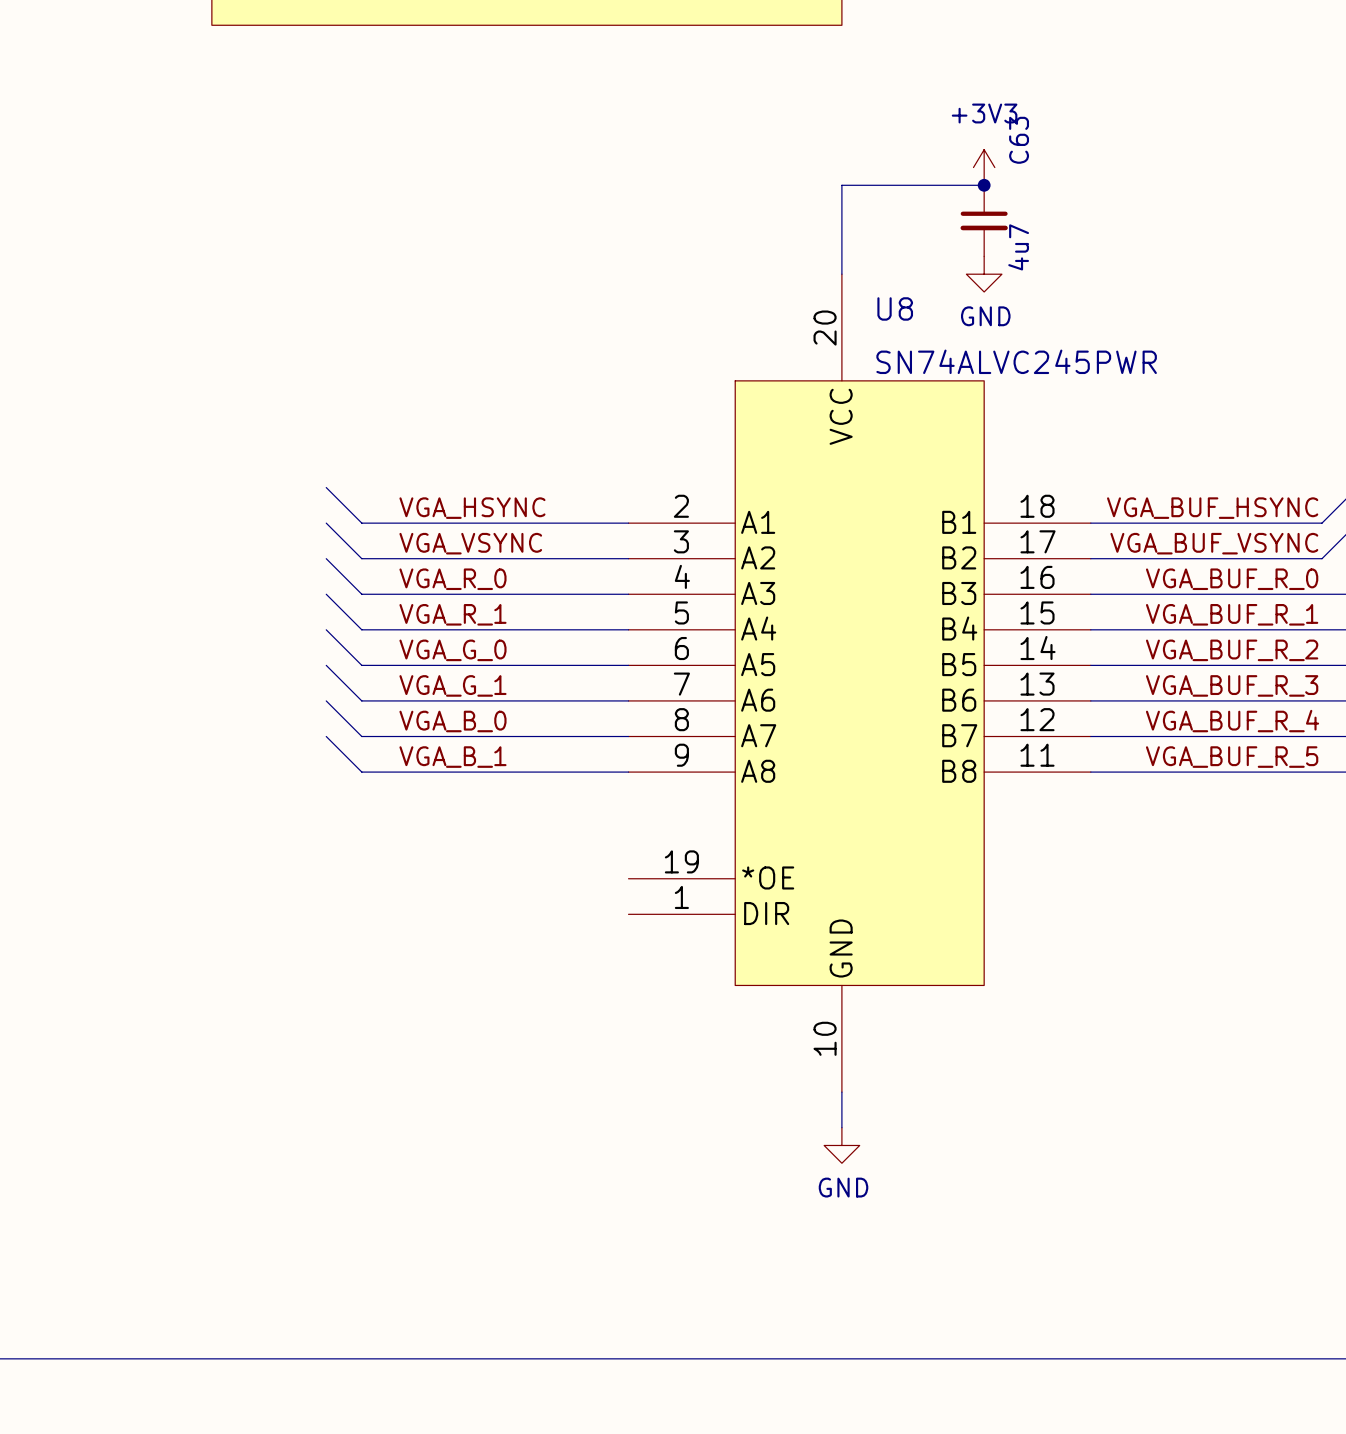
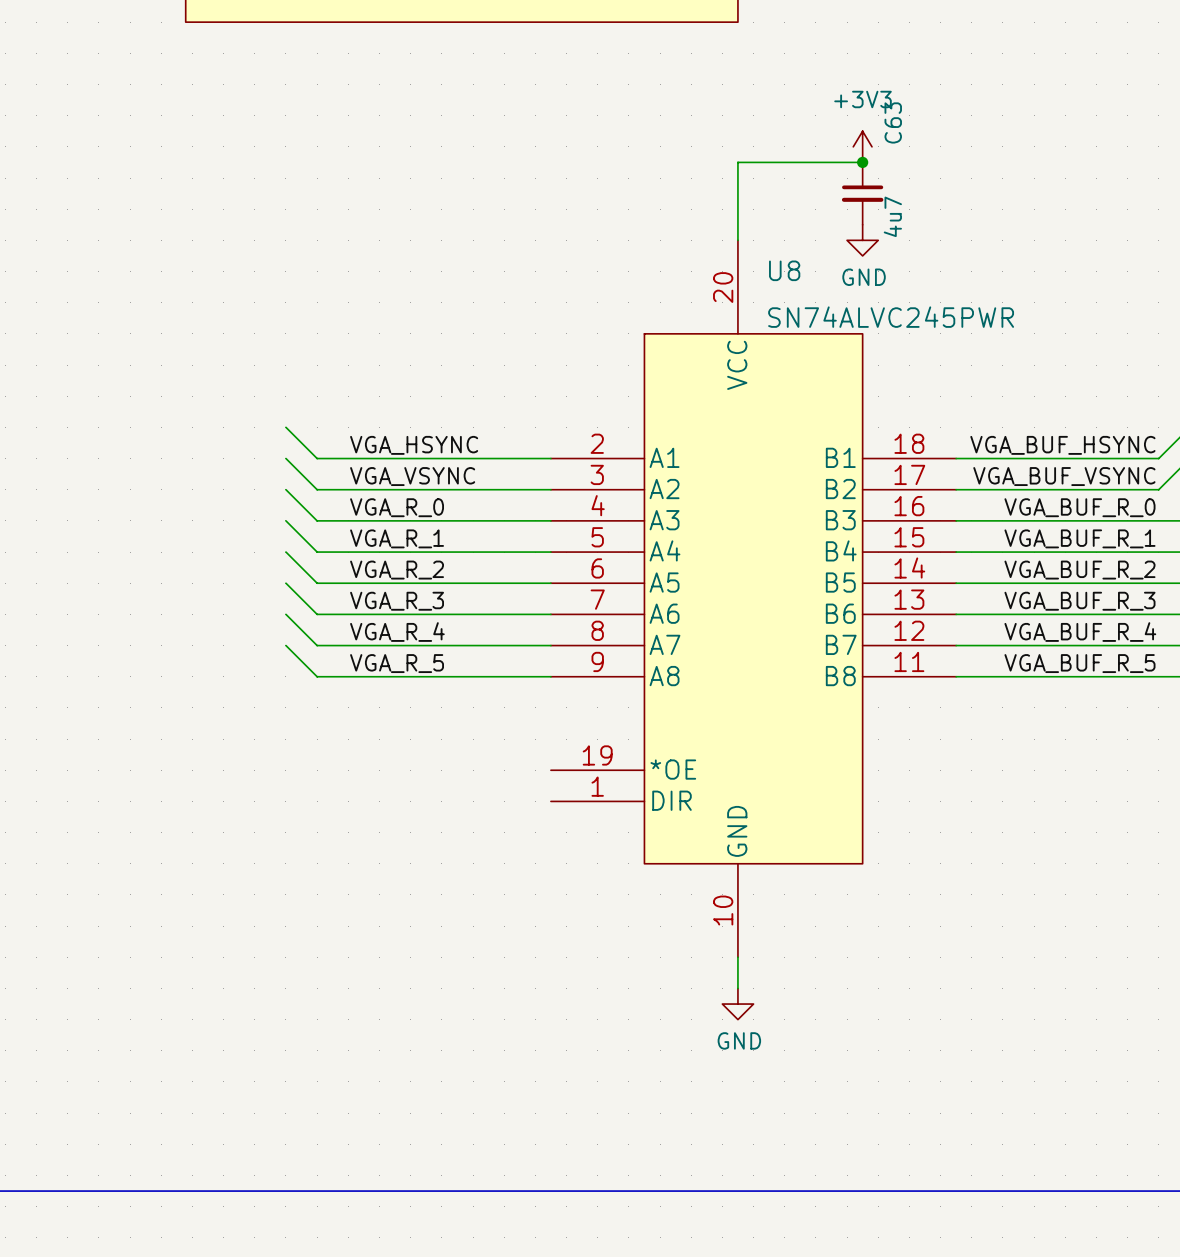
label: VGA_G_0 (452, 650) -> VGA_R_2 (397, 570)
label: VGA_G_1 (452, 685) -> VGA_R_3 (397, 601)
label: VGA_B_0 (452, 721) -> VGA_R_4 (397, 632)
label: VGA_B_1 (452, 757) -> VGA_R_5 (397, 663)

